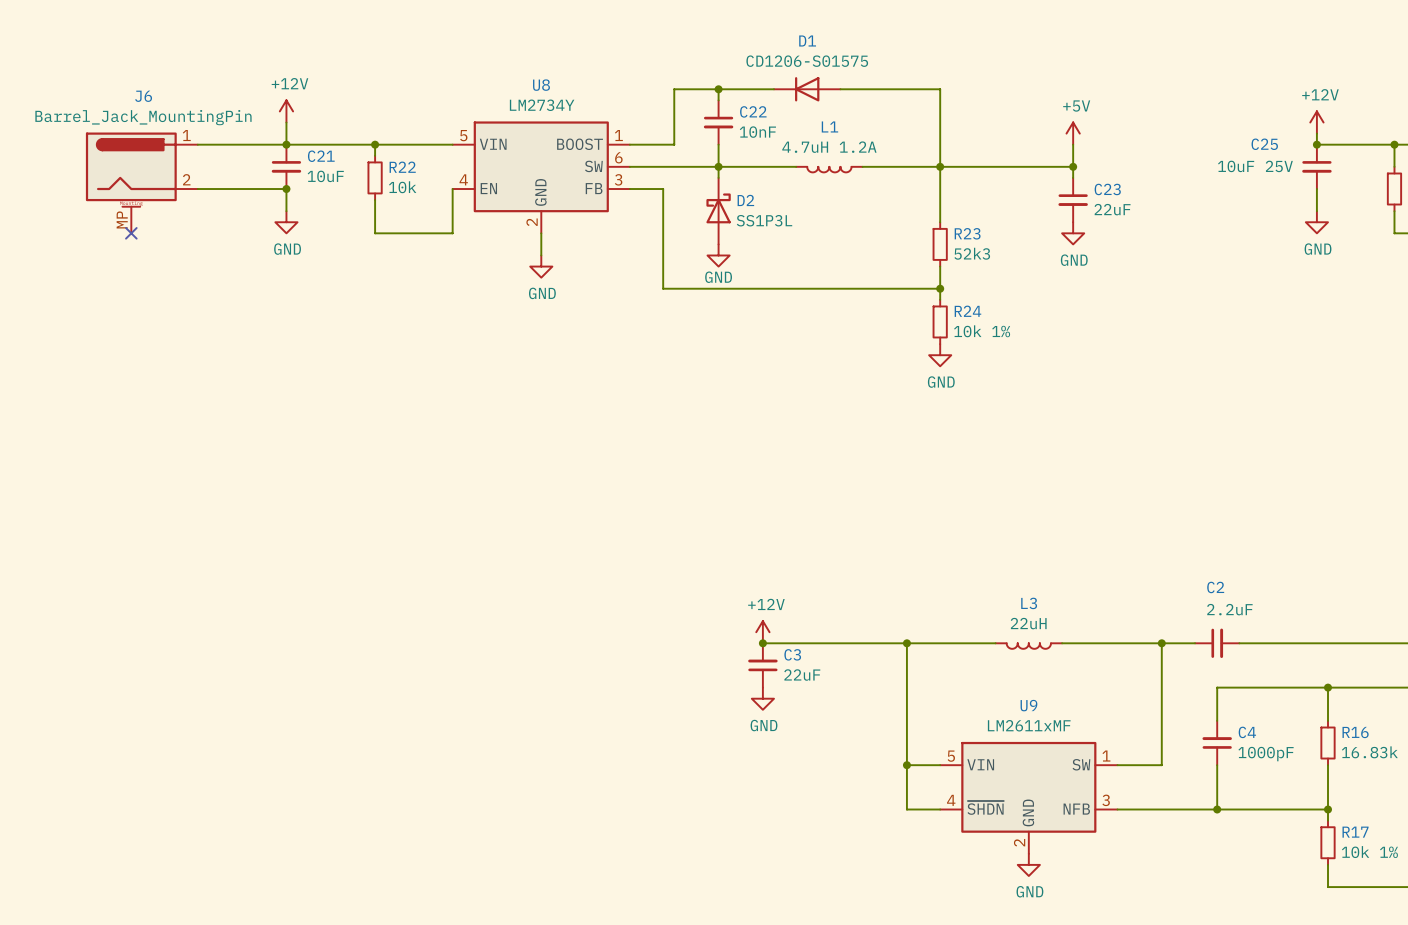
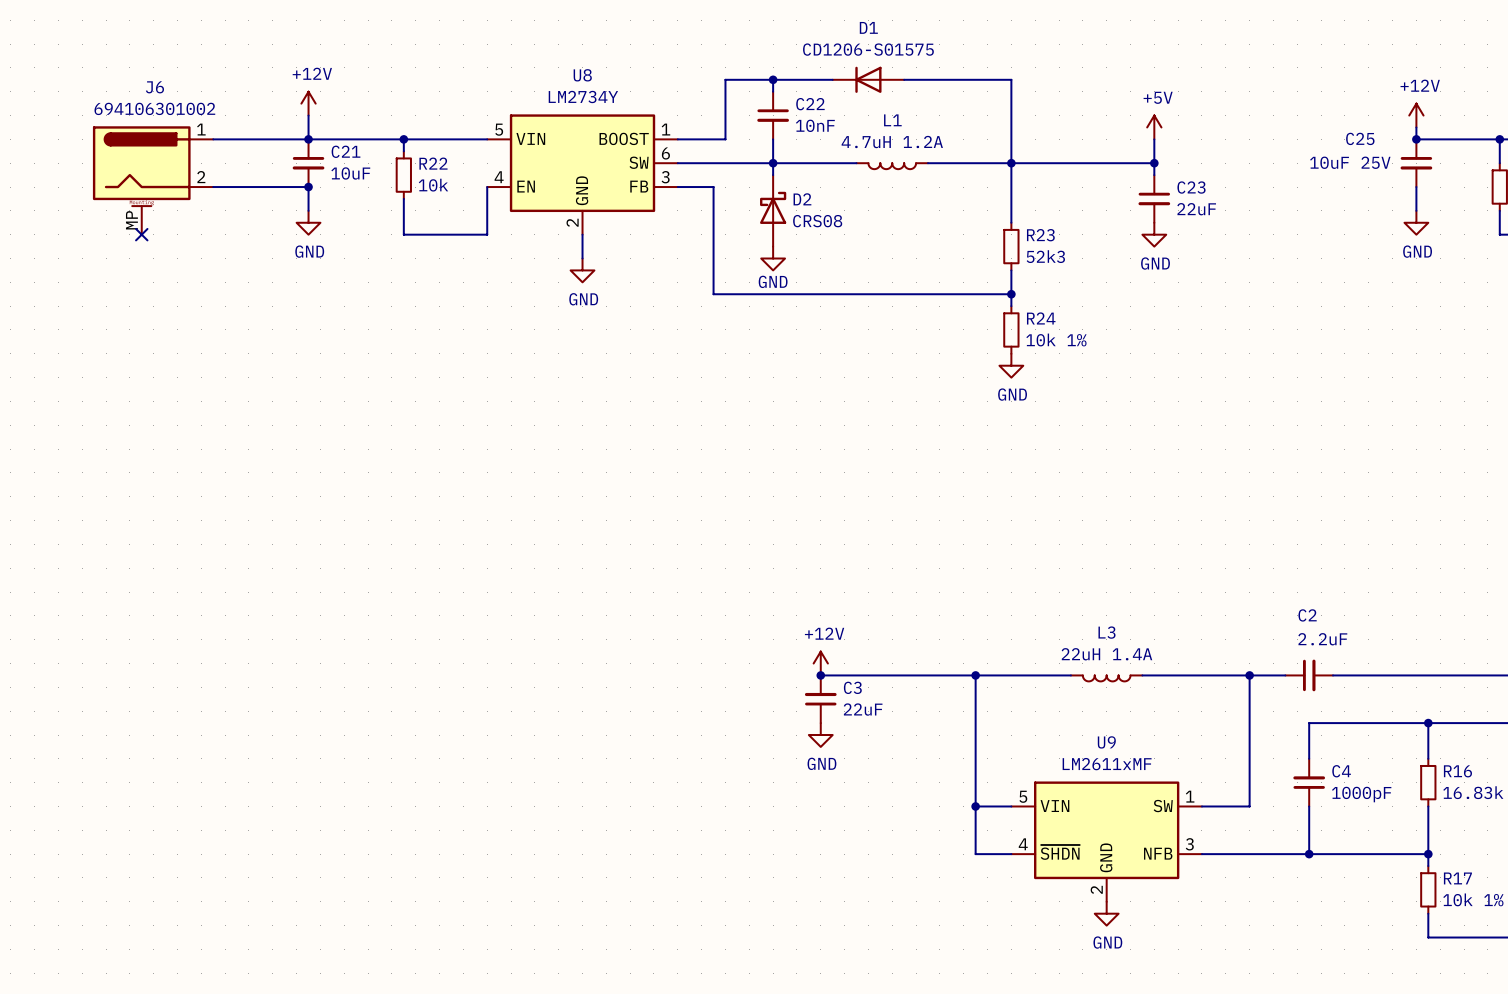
J6 value: Barrel_Jack_MountingPin (143, 117) -> 694106301002 (154, 108)
D2 value: SS1P3L (764, 220) -> CRS08 (817, 221)
L3 value: 22uH (1028, 623) -> 22uH 1.4A (1106, 654)

